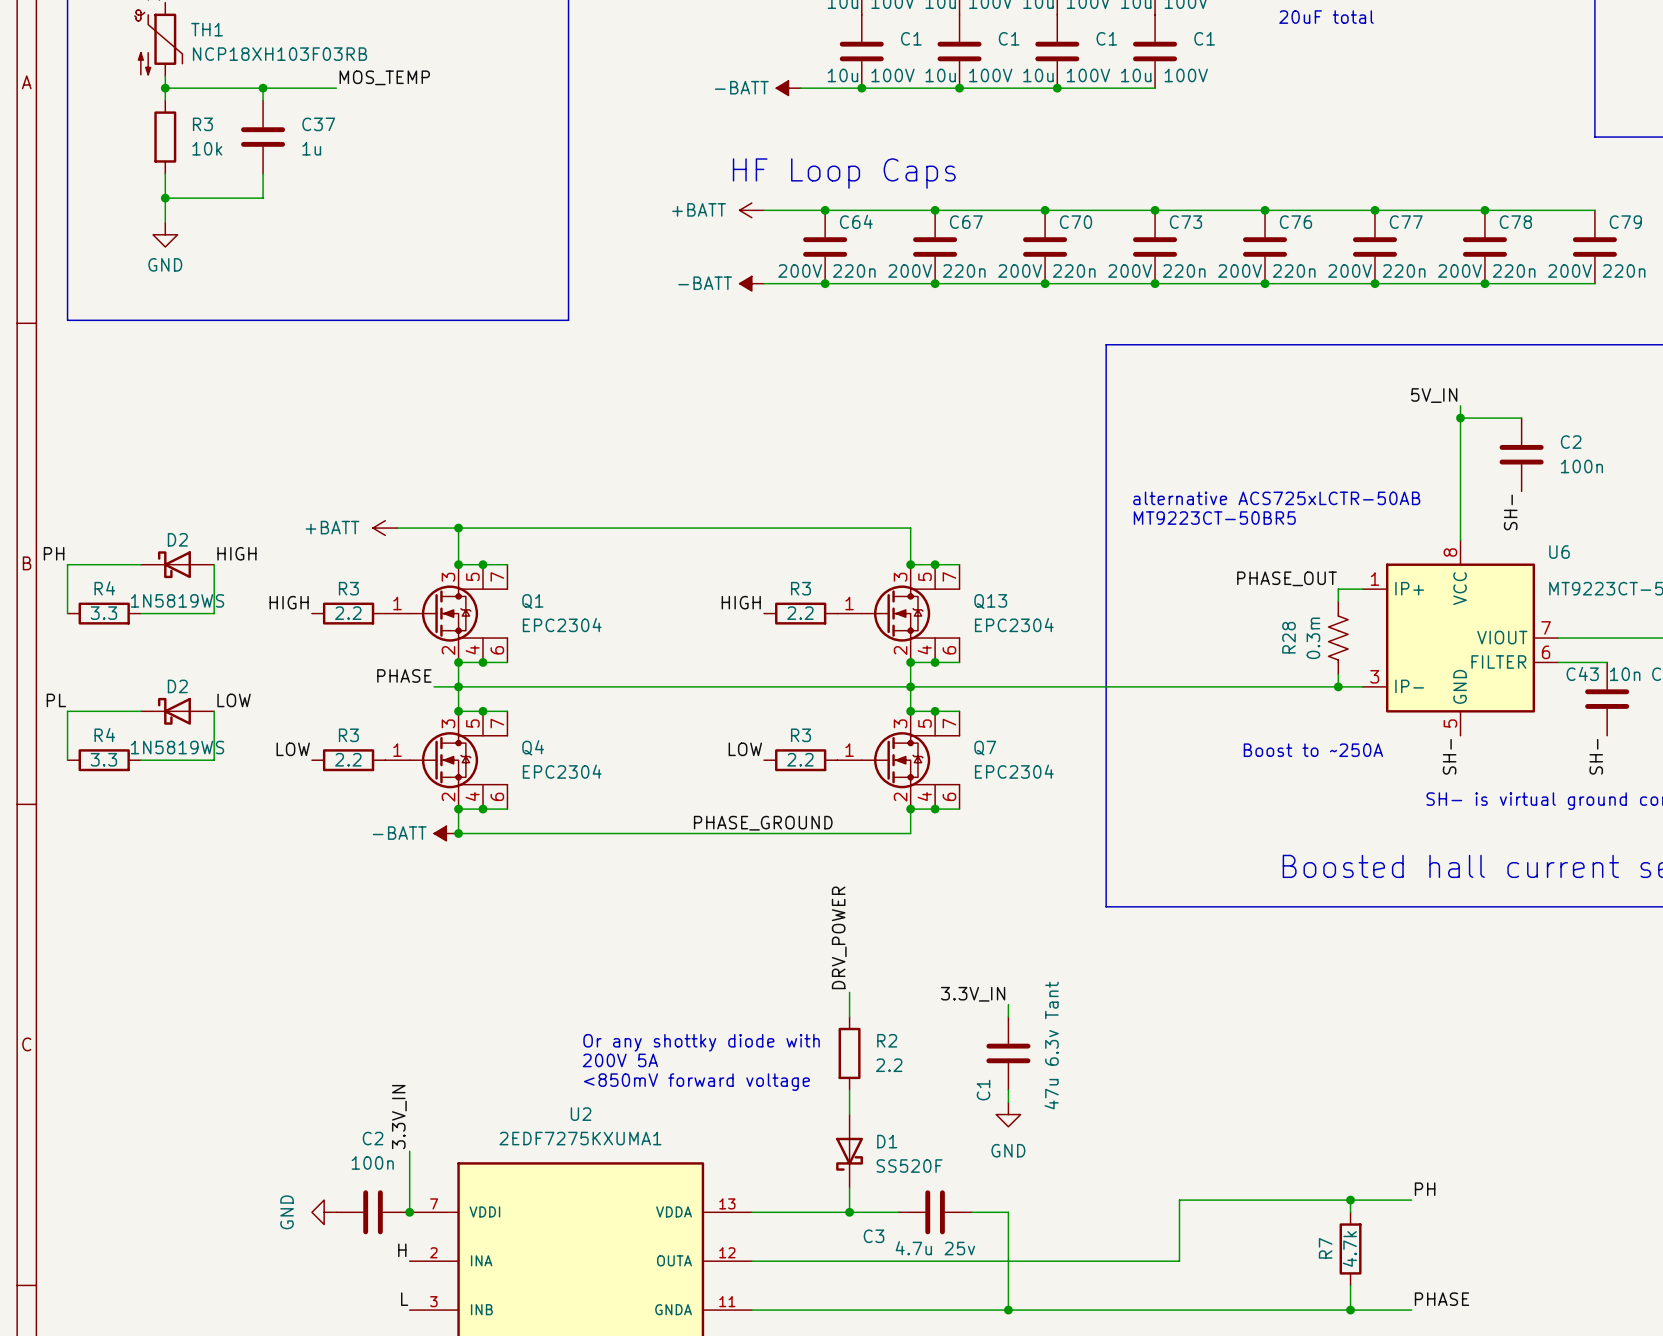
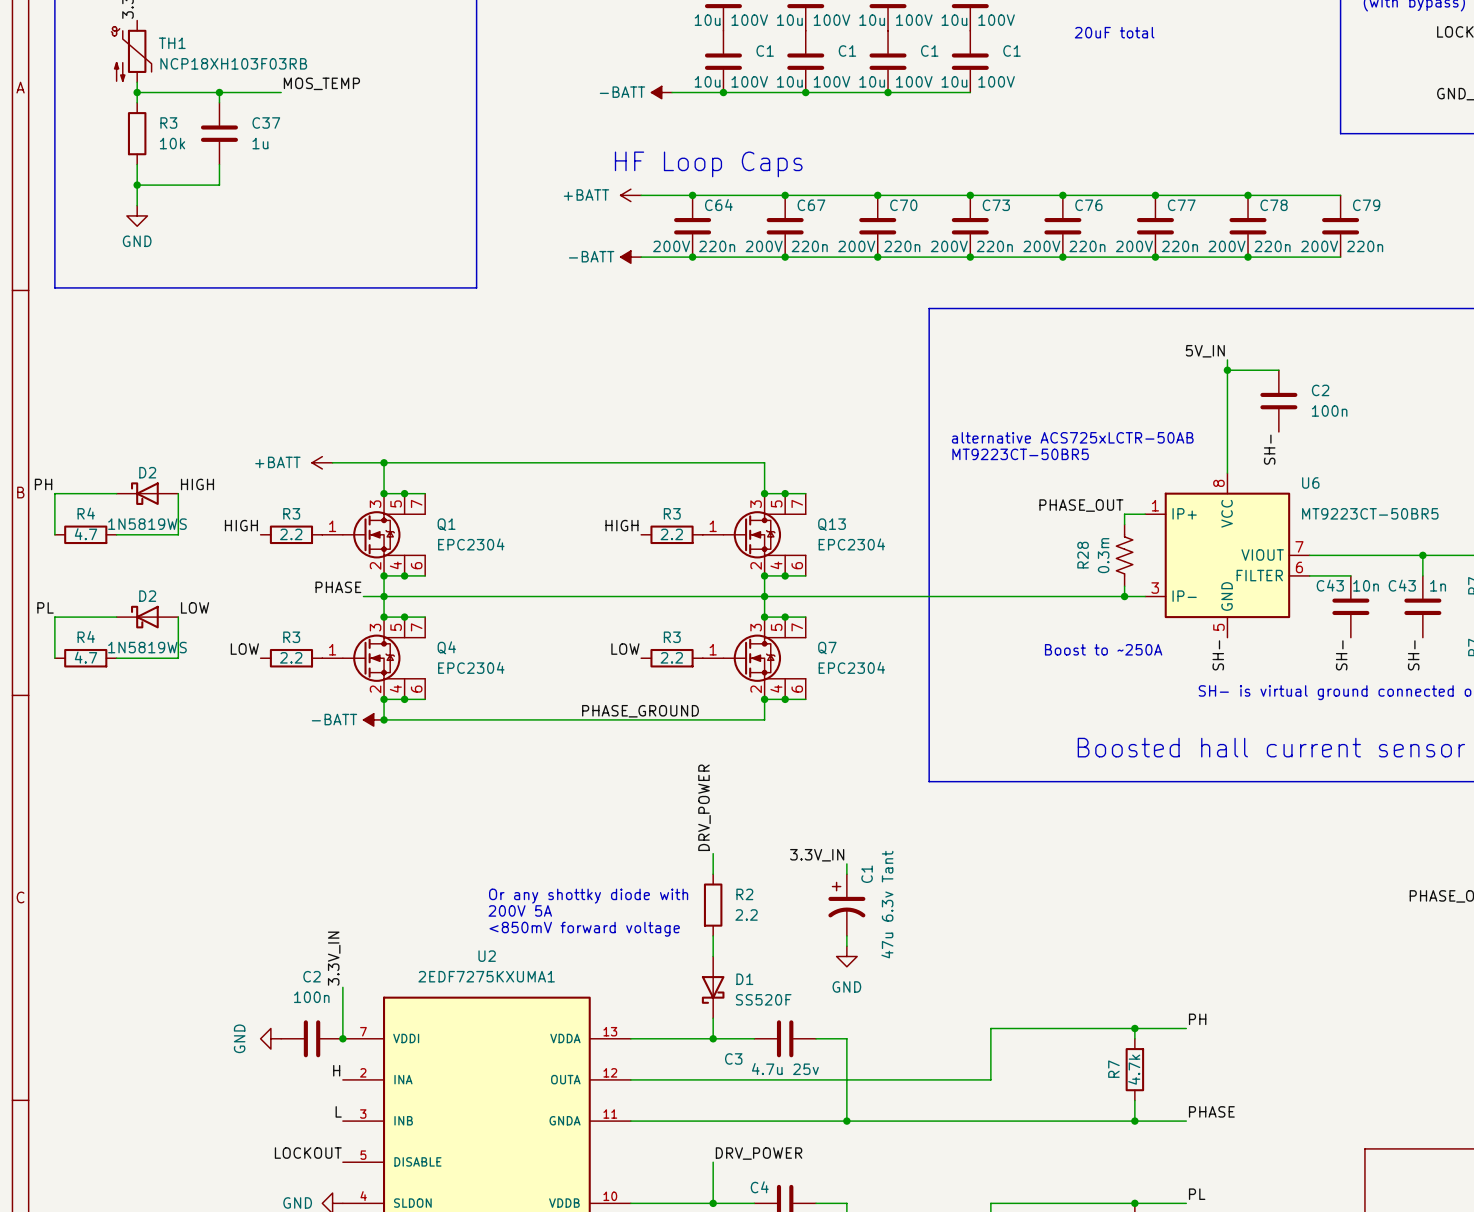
R4 value: 3.3 (103, 613) -> 4.7 (85, 534)
R4 value: 3.3 (103, 759) -> 4.7 (85, 657)
C1 symbol: [986, 1016, 1031, 1091] -> [828, 874, 866, 936]
C1 name position: C1 (983, 1090) -> C1 (867, 874)

